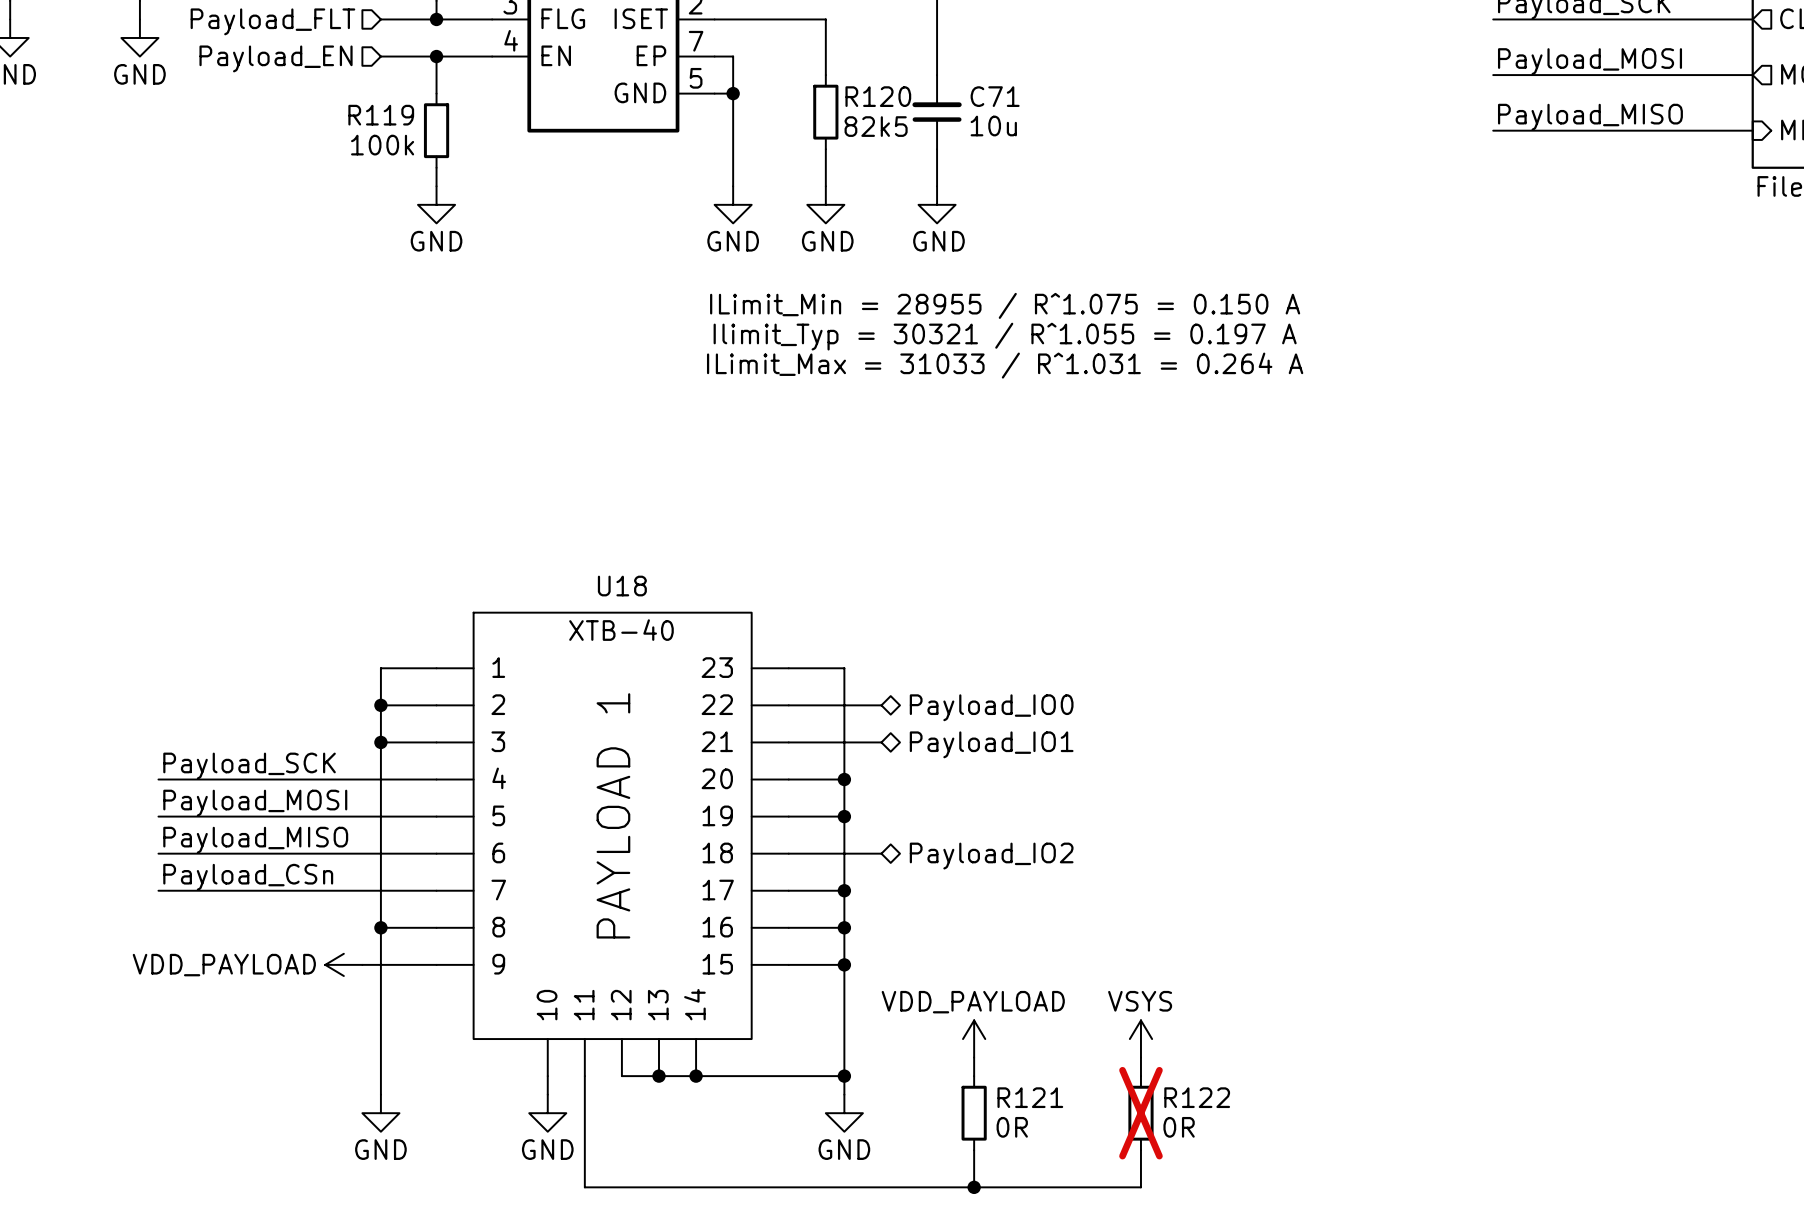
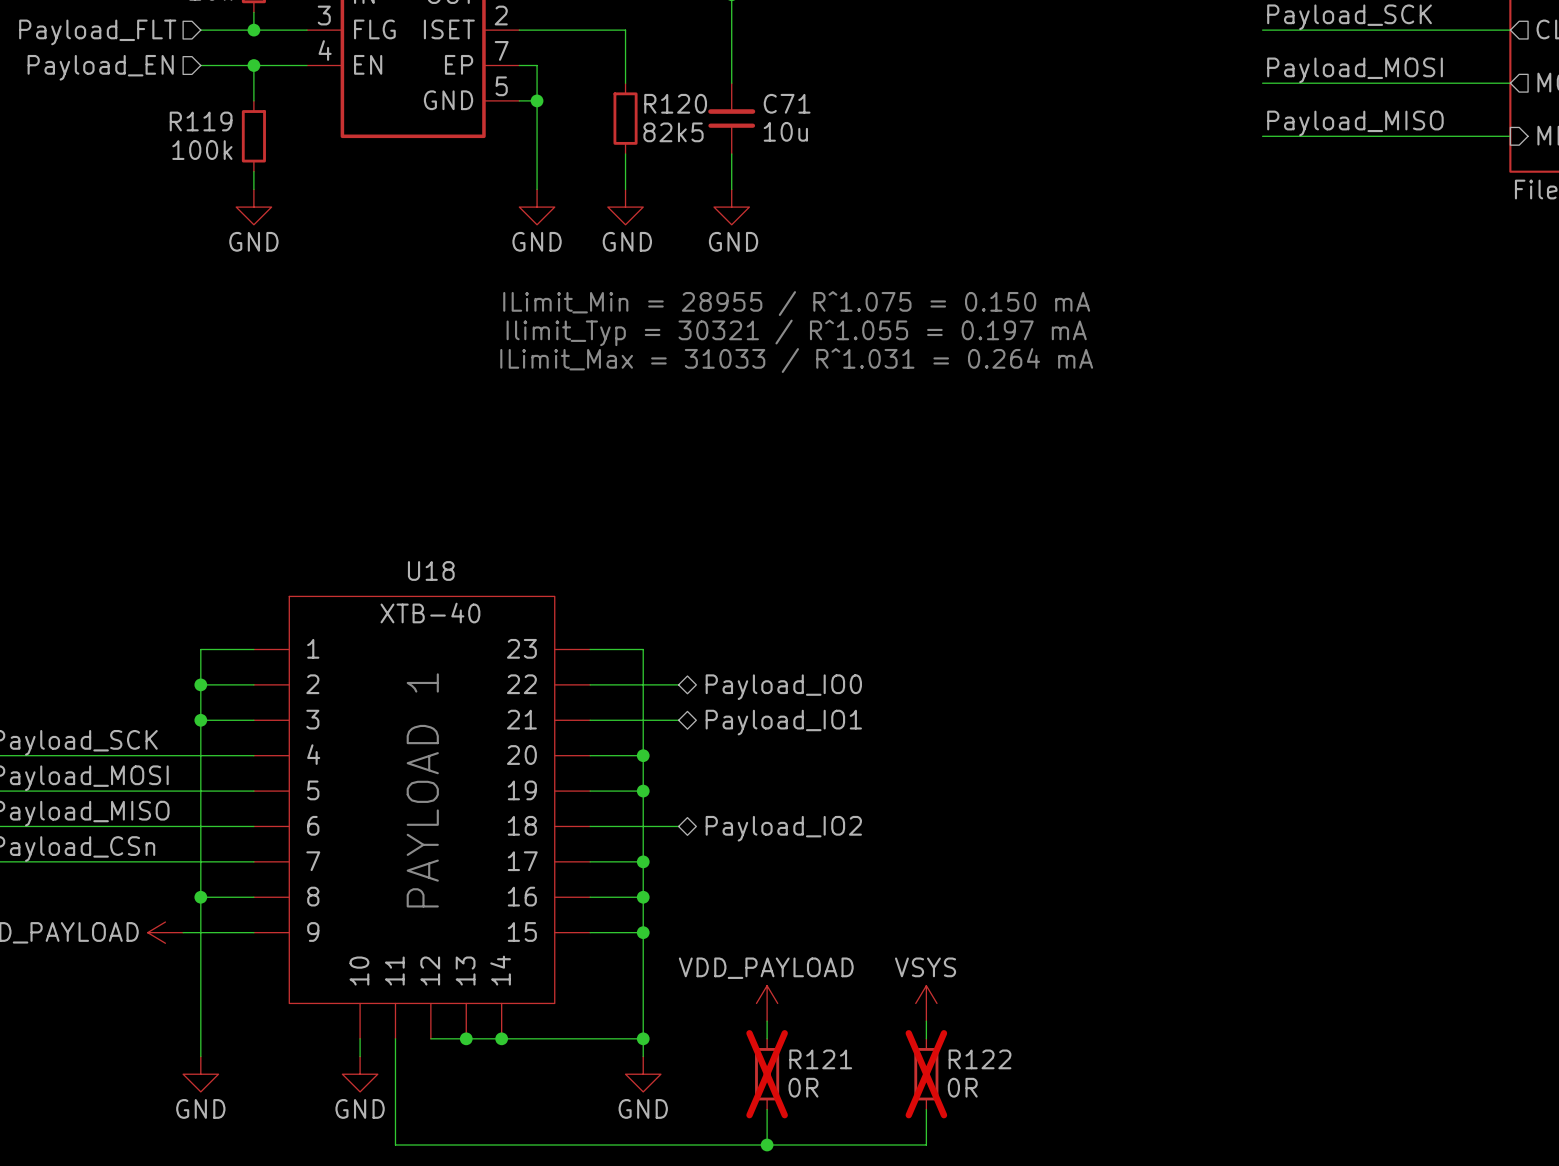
text: ILimit_Min = 28955 / R^1.075 = 0.150 A (1005, 305) -> ILimit_Min = 28955 / R^1.075 = 0.150 mA (796, 303)
text: Ilimit_Typ = 30321 / R^1.055 = 0.197 A (1005, 336) -> Ilimit_Typ = 30321 / R^1.055 = 0.197 mA (796, 332)
text: ILimit_Max = 31033 / R^1.031 = 0.264 A (1005, 365) -> ILimit_Max = 31033 / R^1.031 = 0.264 mA (796, 360)
R121 do-not-place cross: none -> (767, 1074)

